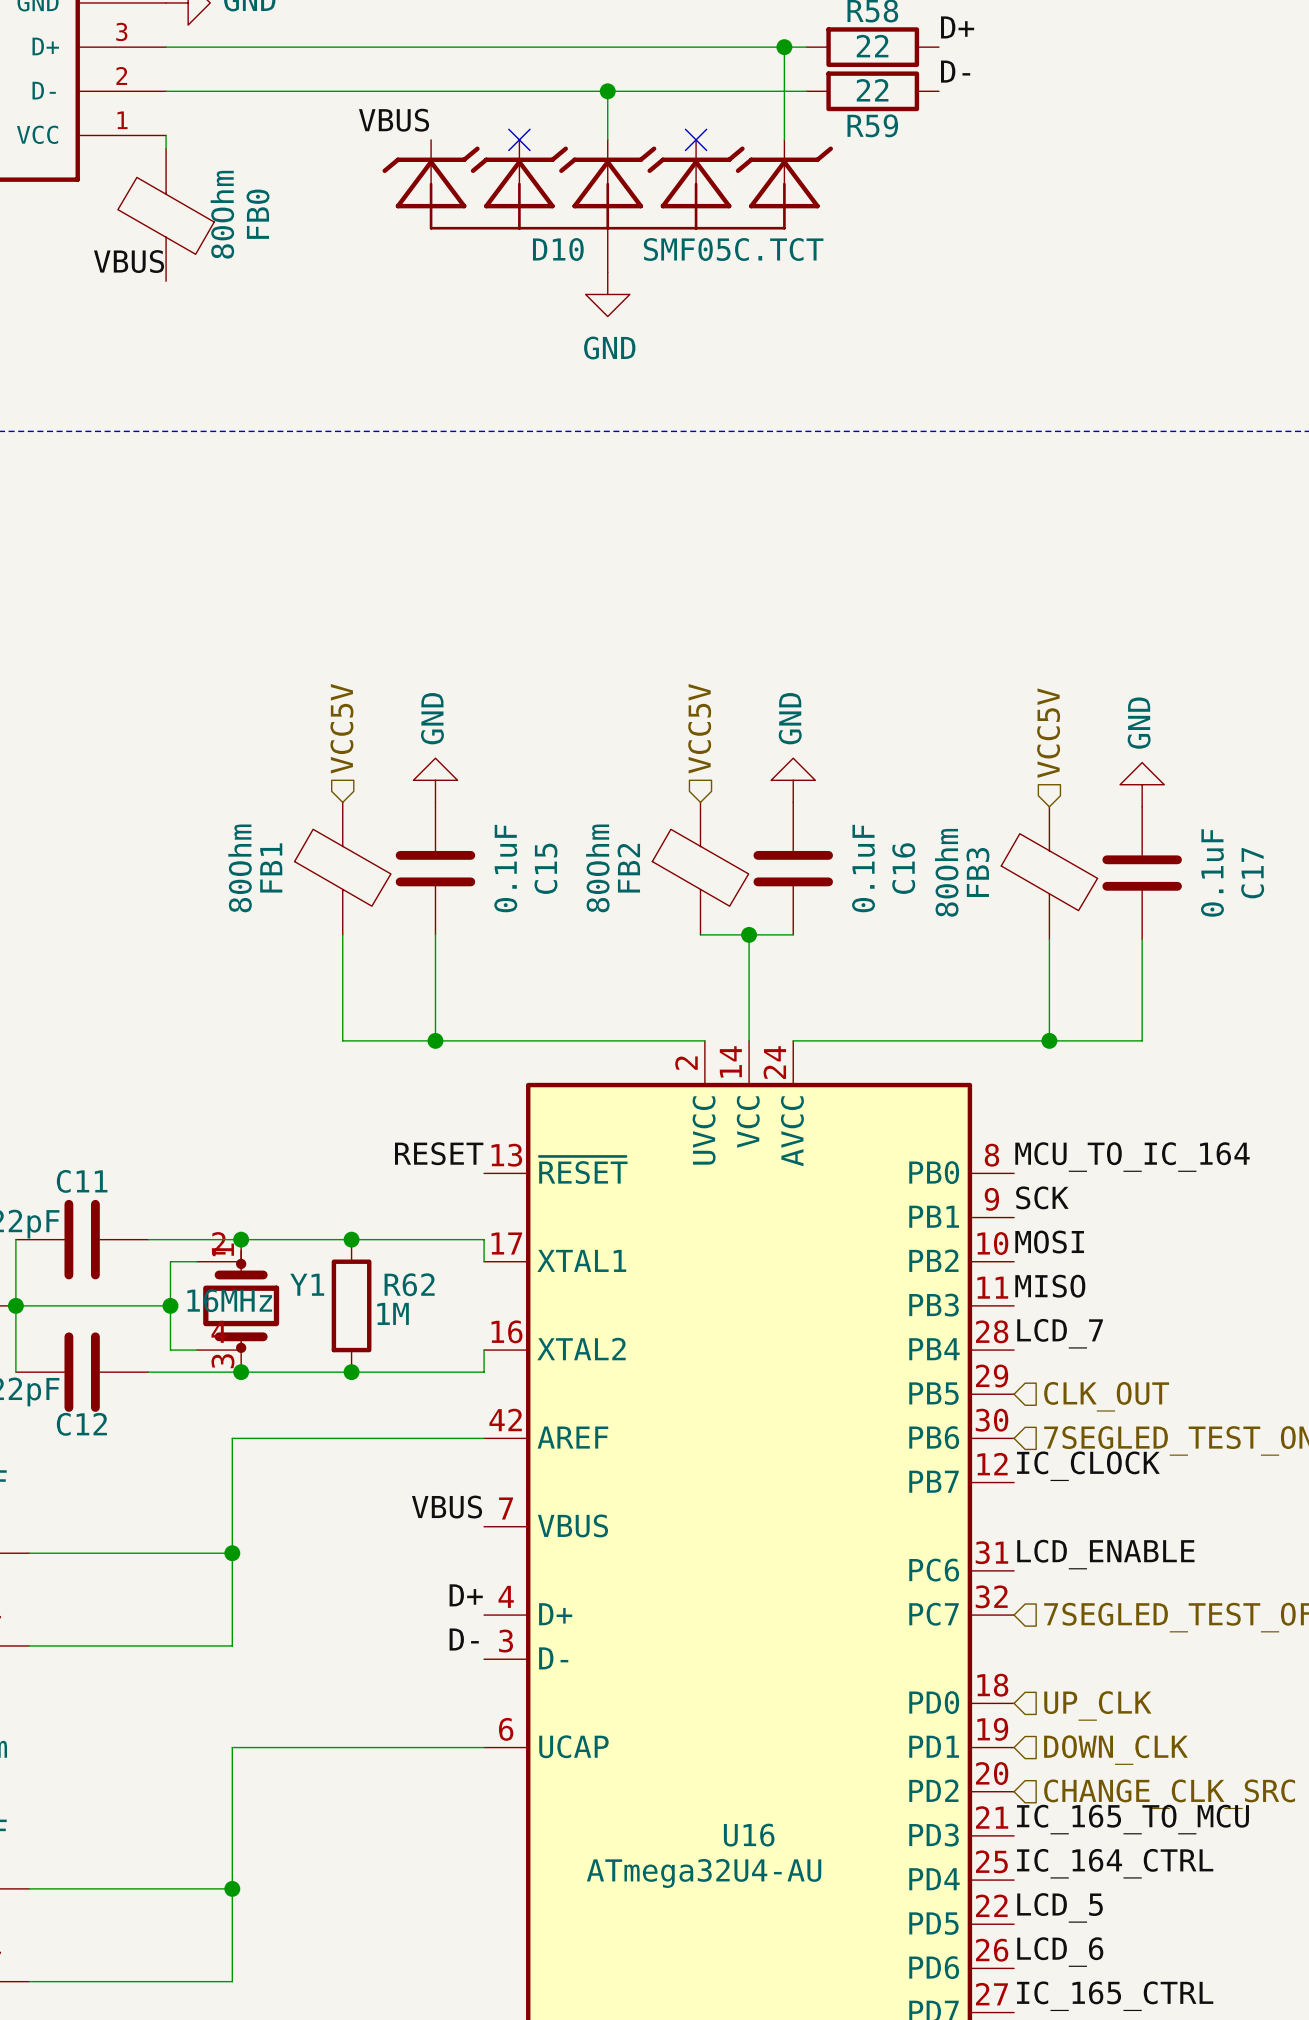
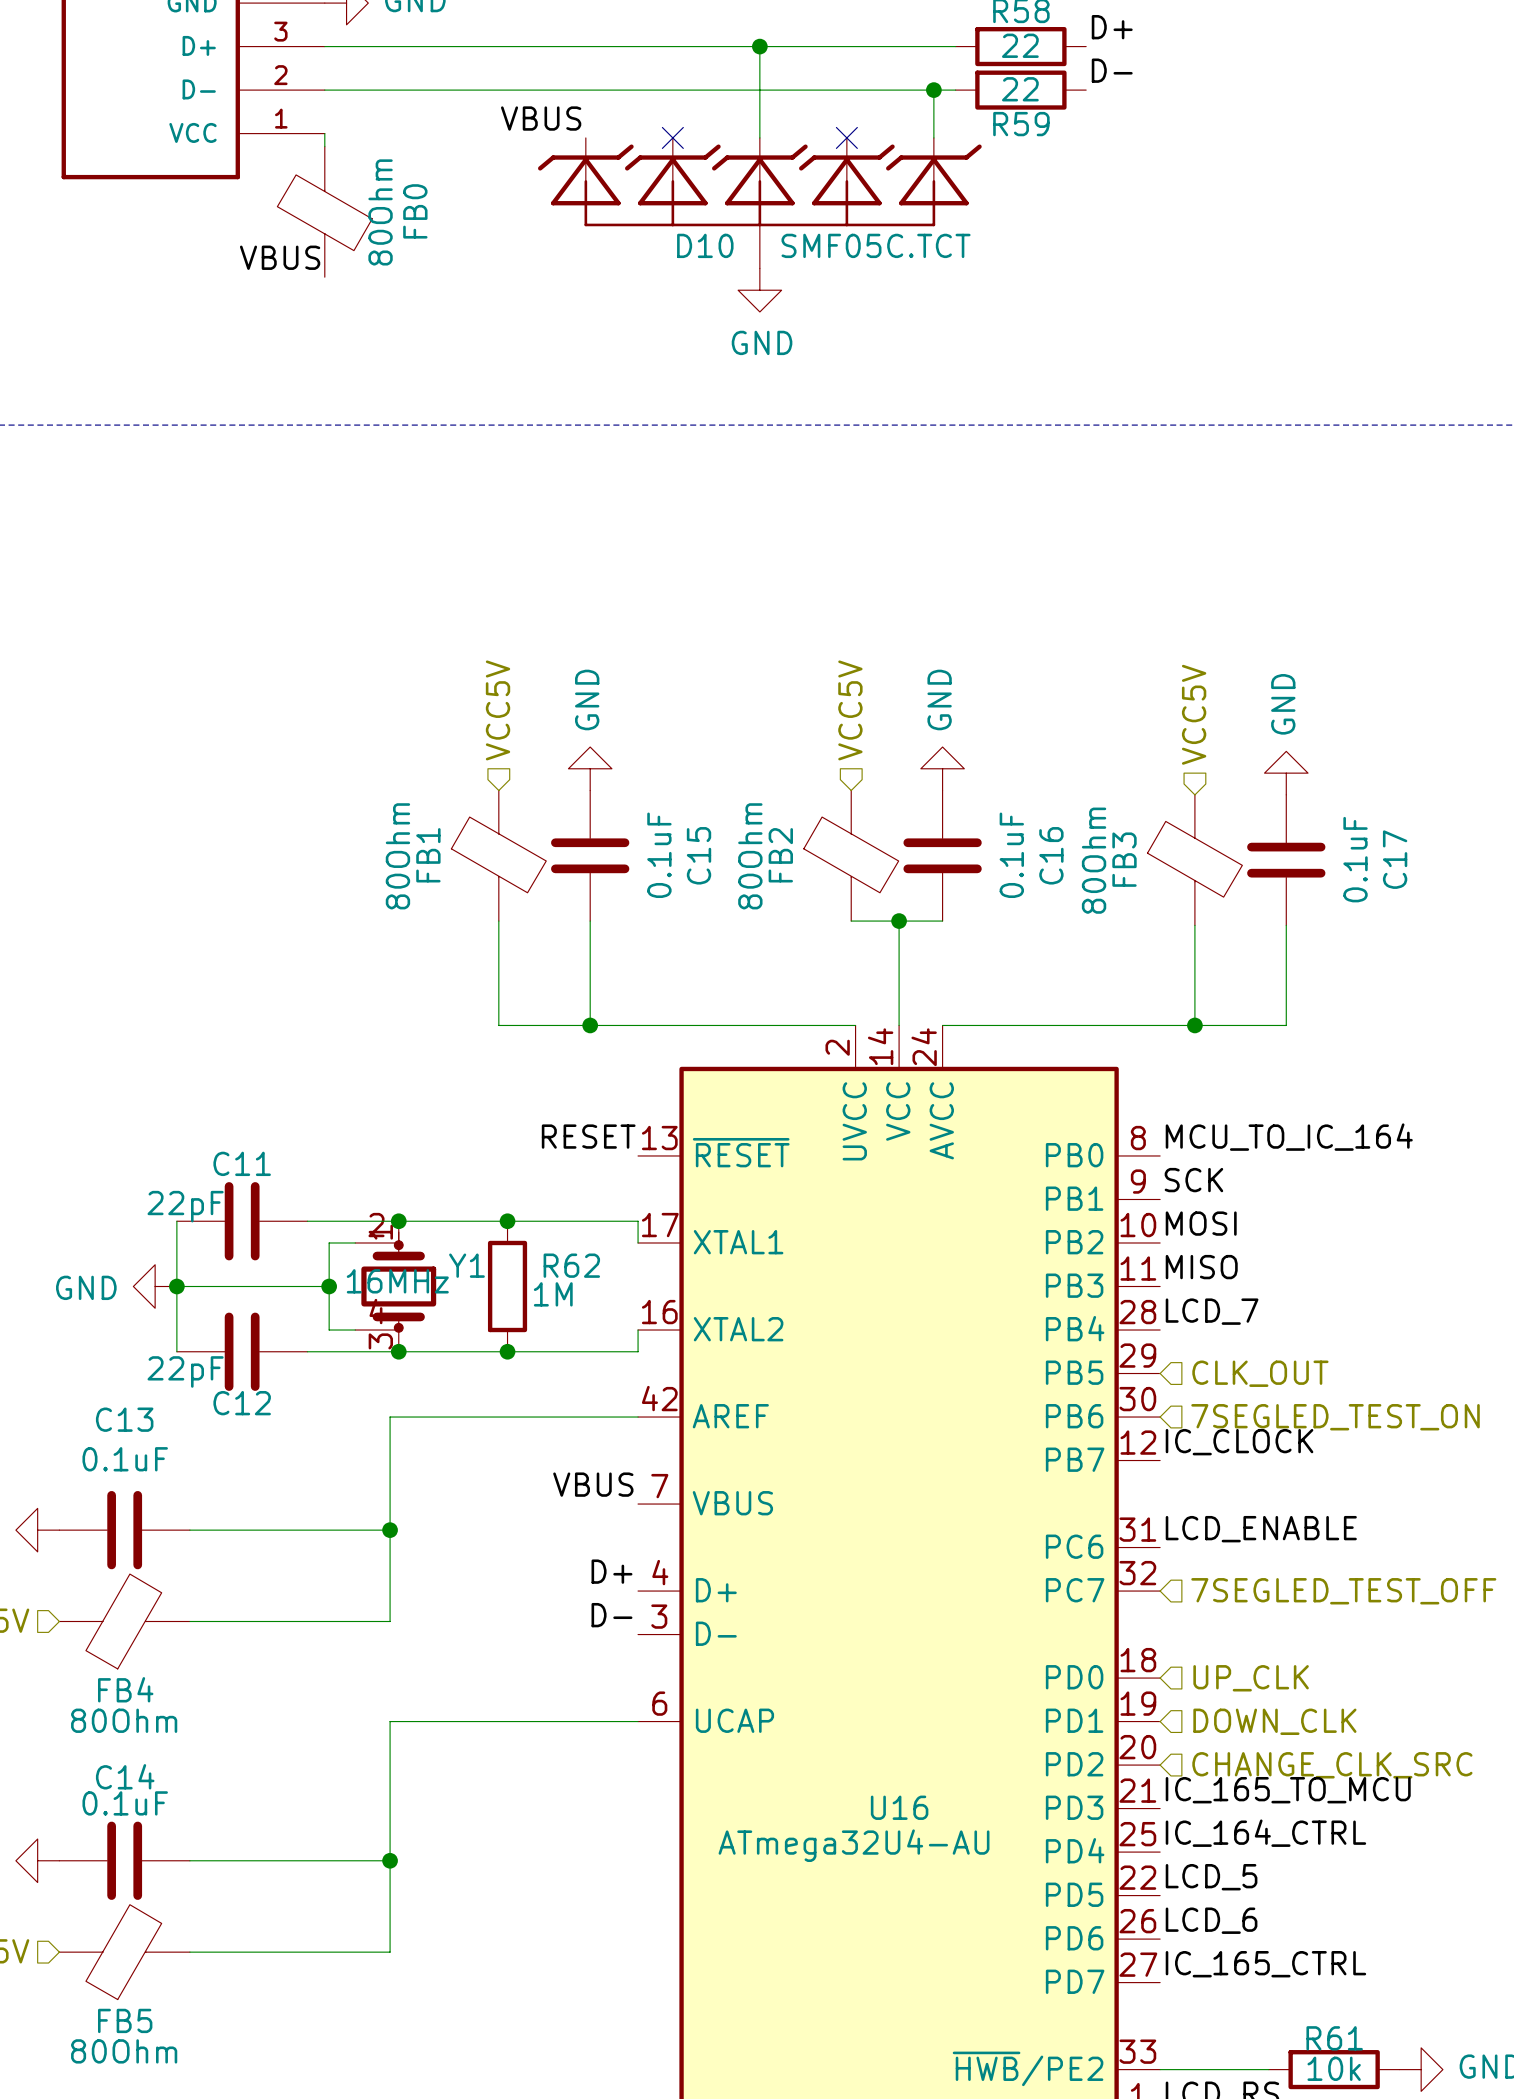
wire: (784, 47) (784, 91) -> (759, 46) (759, 90)
junction position: (784, 47) -> (933, 90)
junction position: (607, 91) -> (759, 46)

